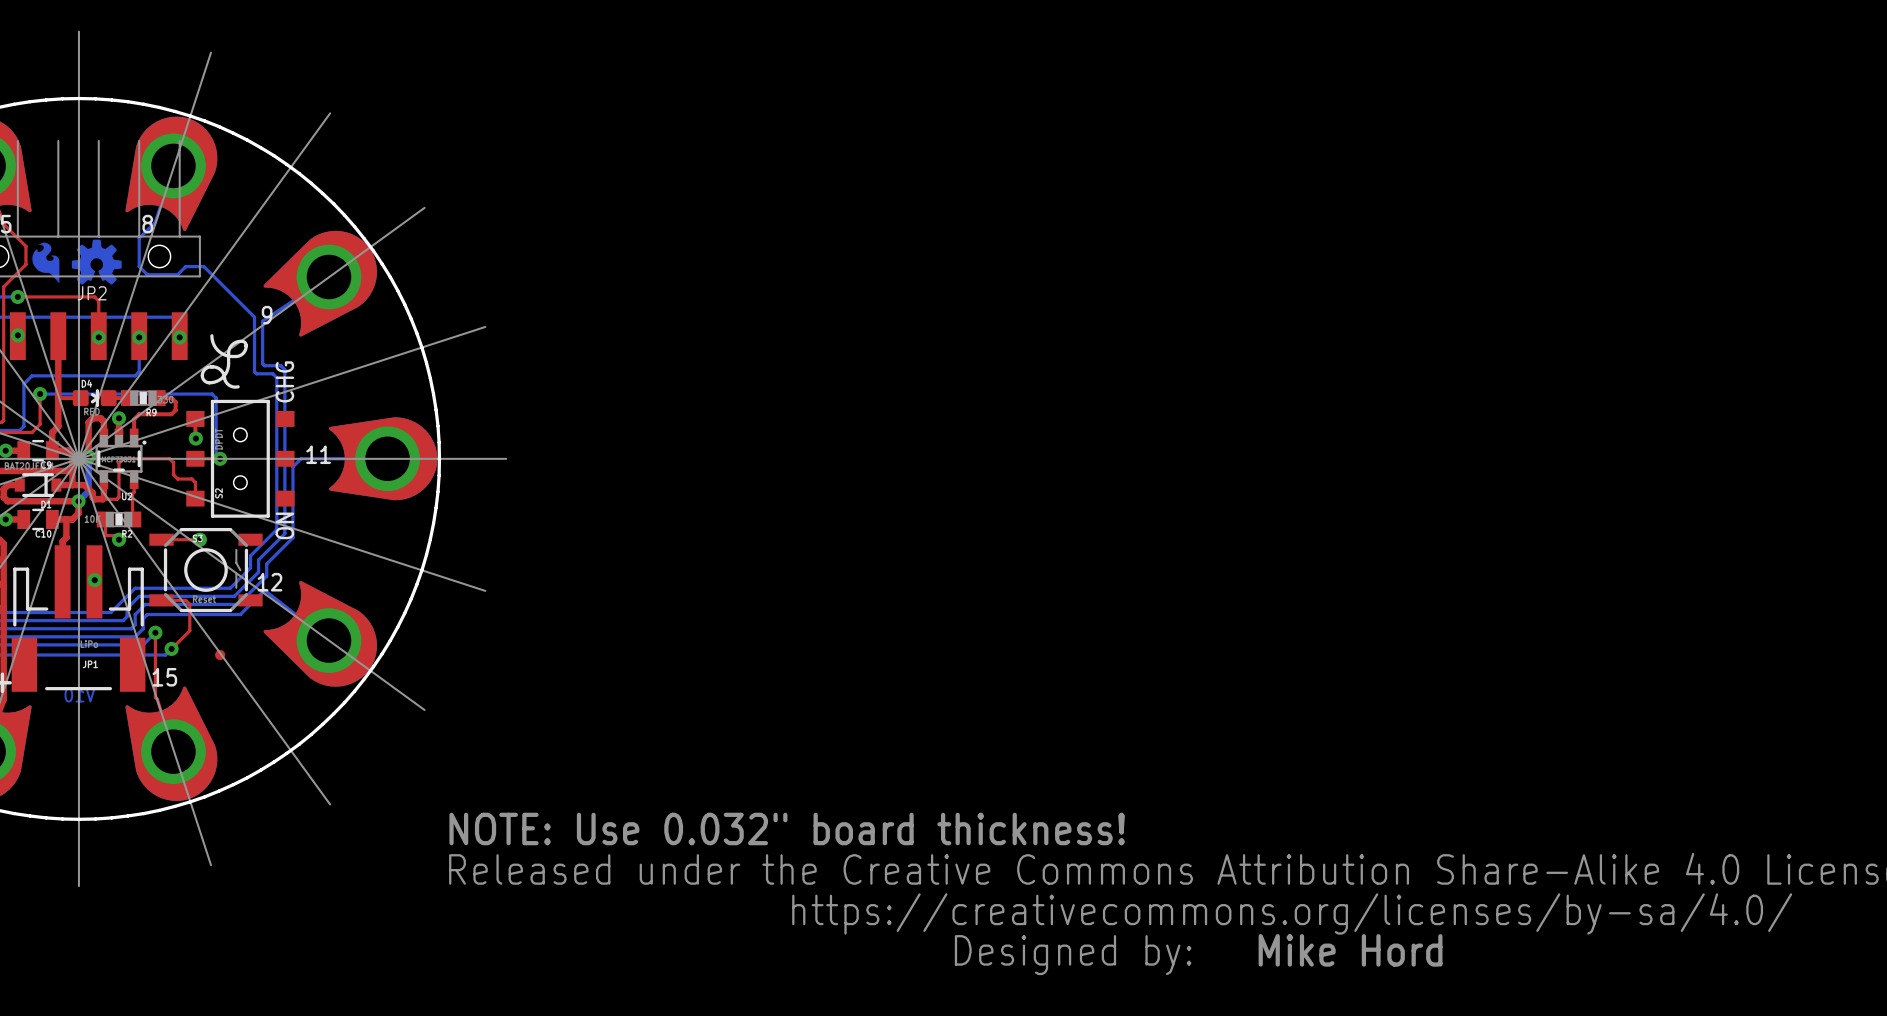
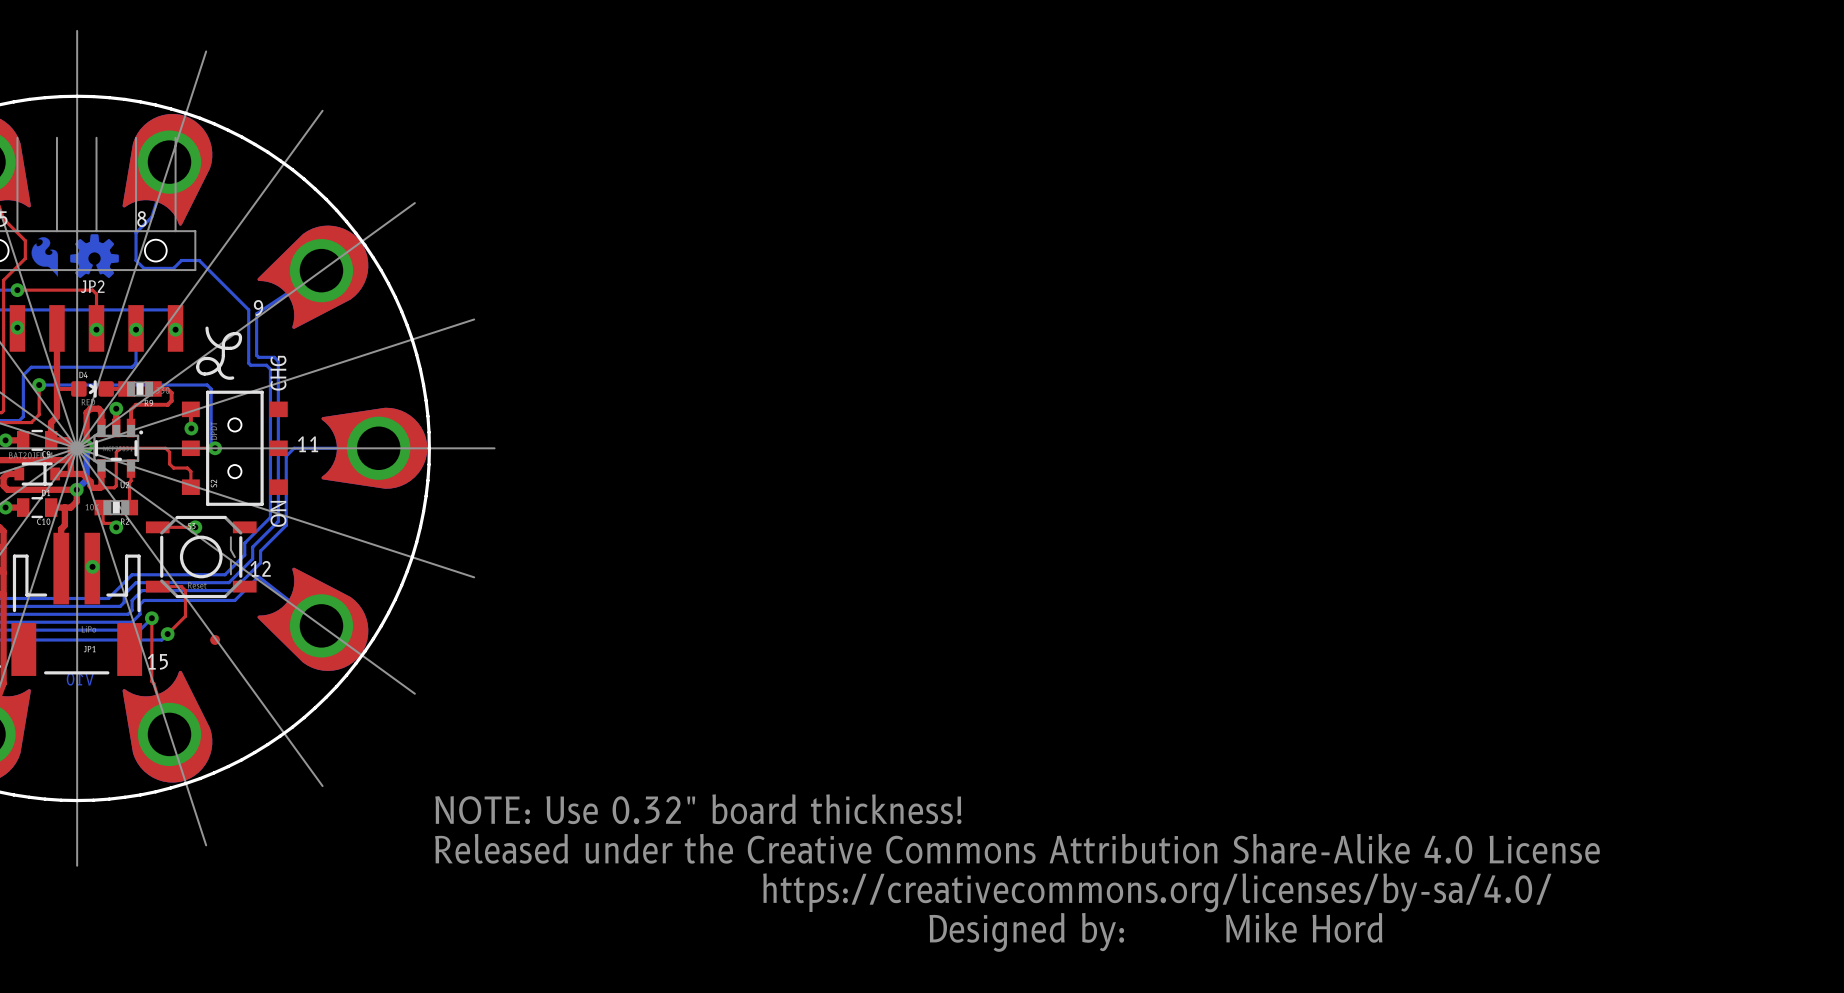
text: NOTE: Use 0.032" board thickness! (787, 828) -> NOTE: Use 0.32" board thickness! (698, 809)

